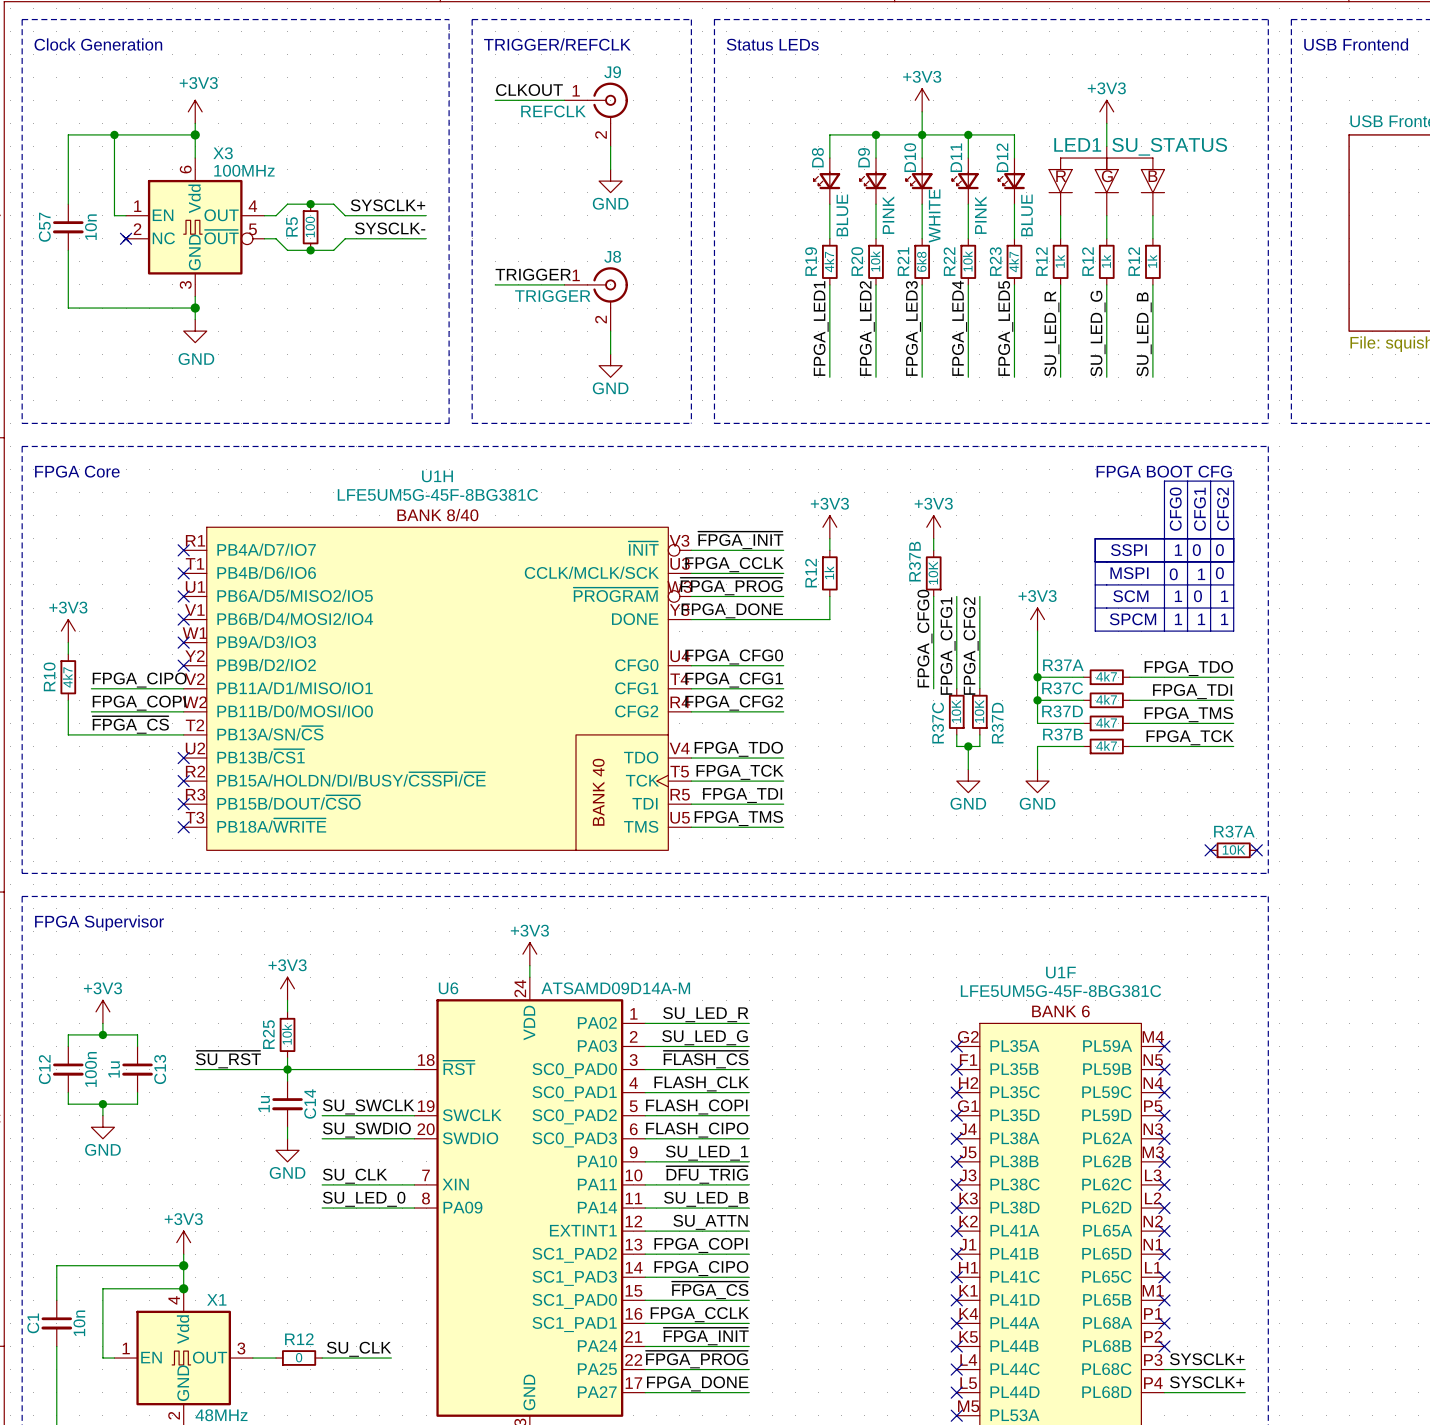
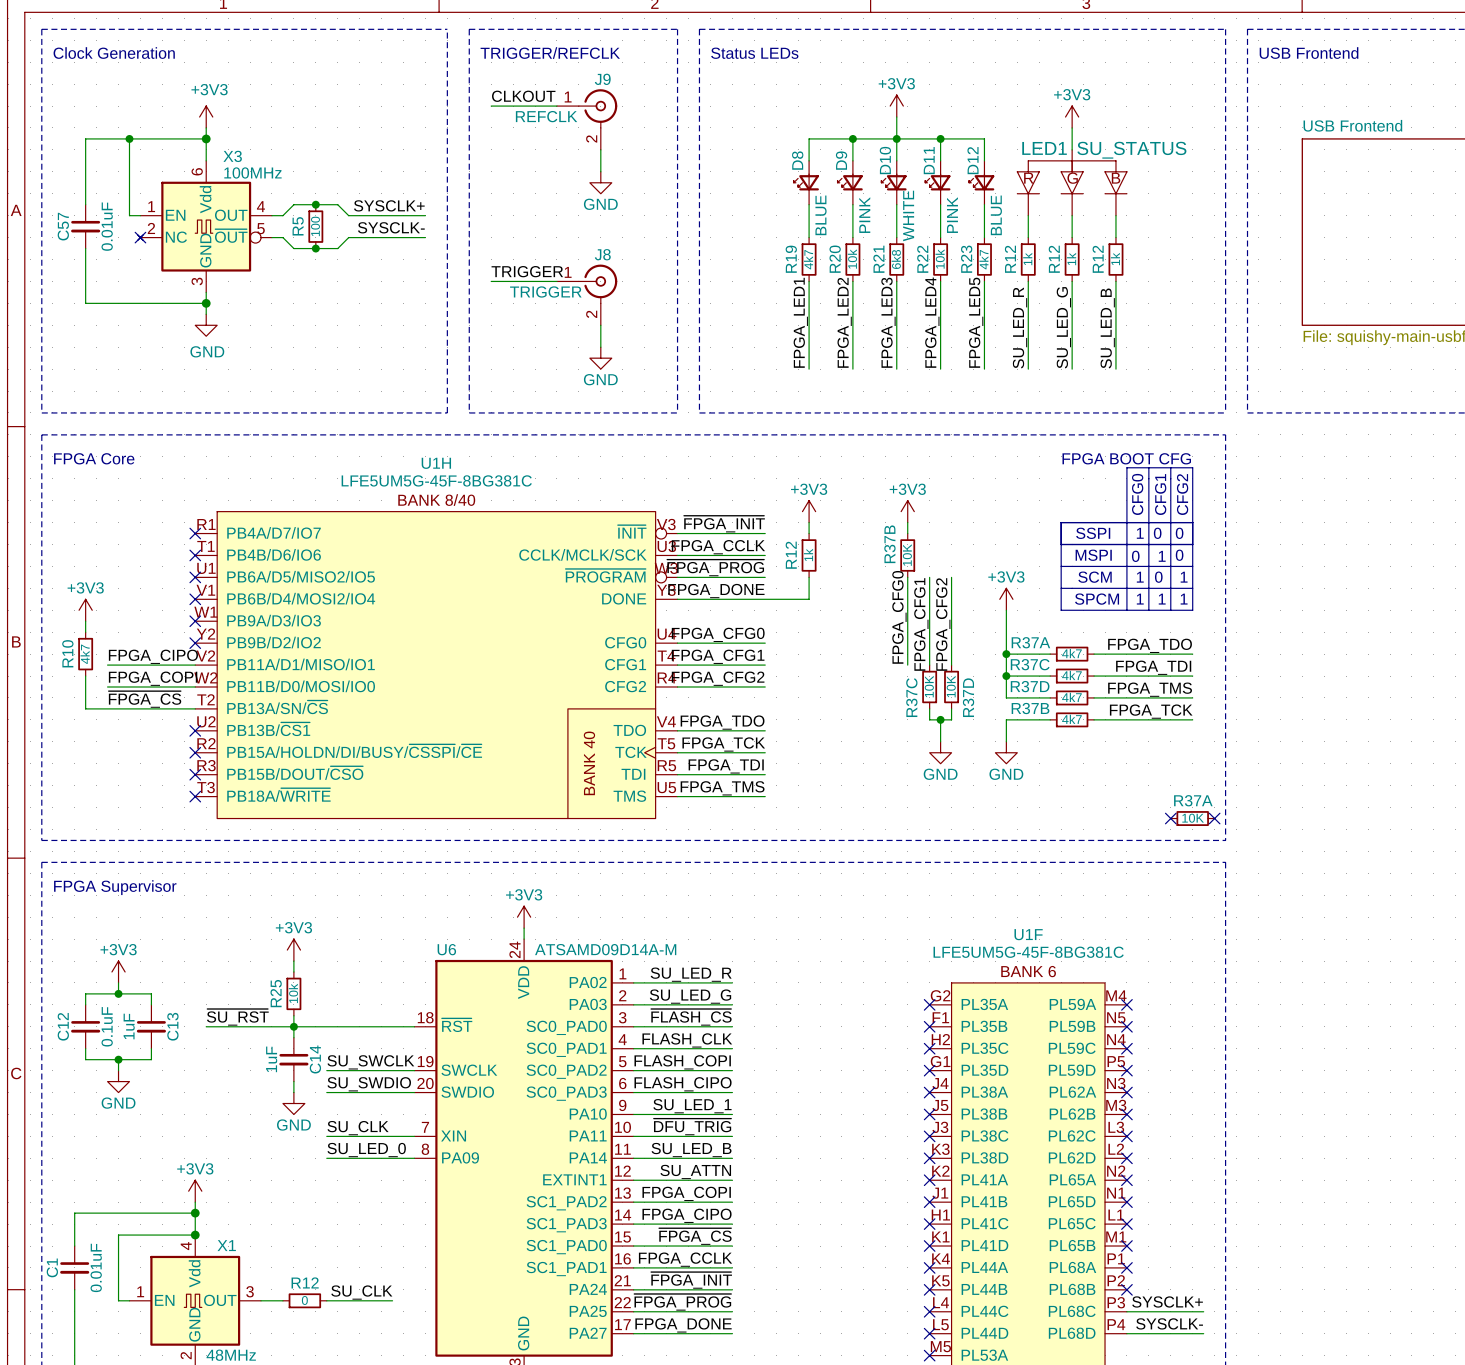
C57 value: 10n (90, 227) -> 0.01uF (107, 226)
C12 value: 100n (90, 1069) -> 0.1uF (107, 1026)
C13 value: 1u (114, 1069) -> 1uF (129, 1026)
C14 value: 1u (264, 1104) -> 1uF (271, 1059)
C1 value: 10n (79, 1323) -> 0.01uF (96, 1267)
label: SYSCLK+ (1207, 1382) -> SYSCLK- (1169, 1323)

